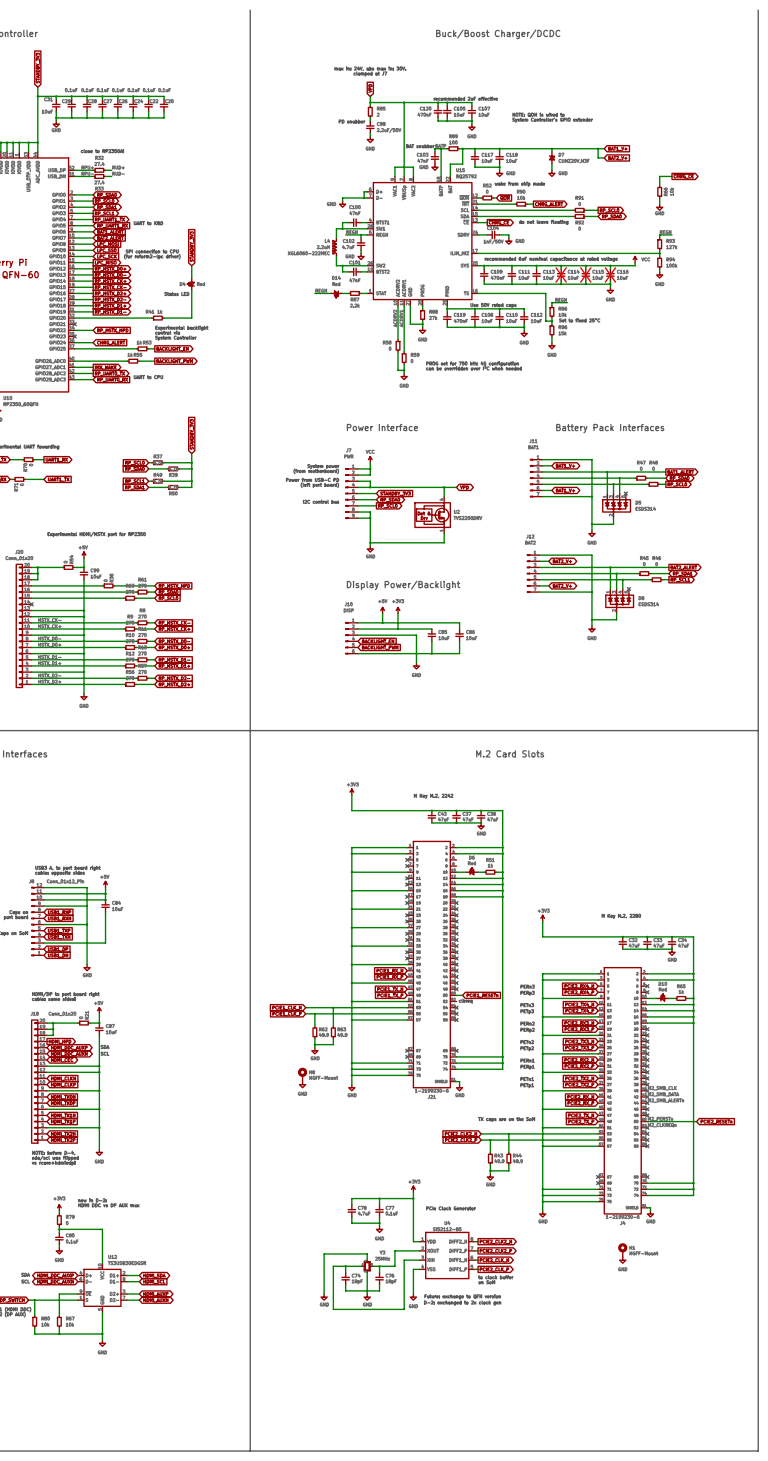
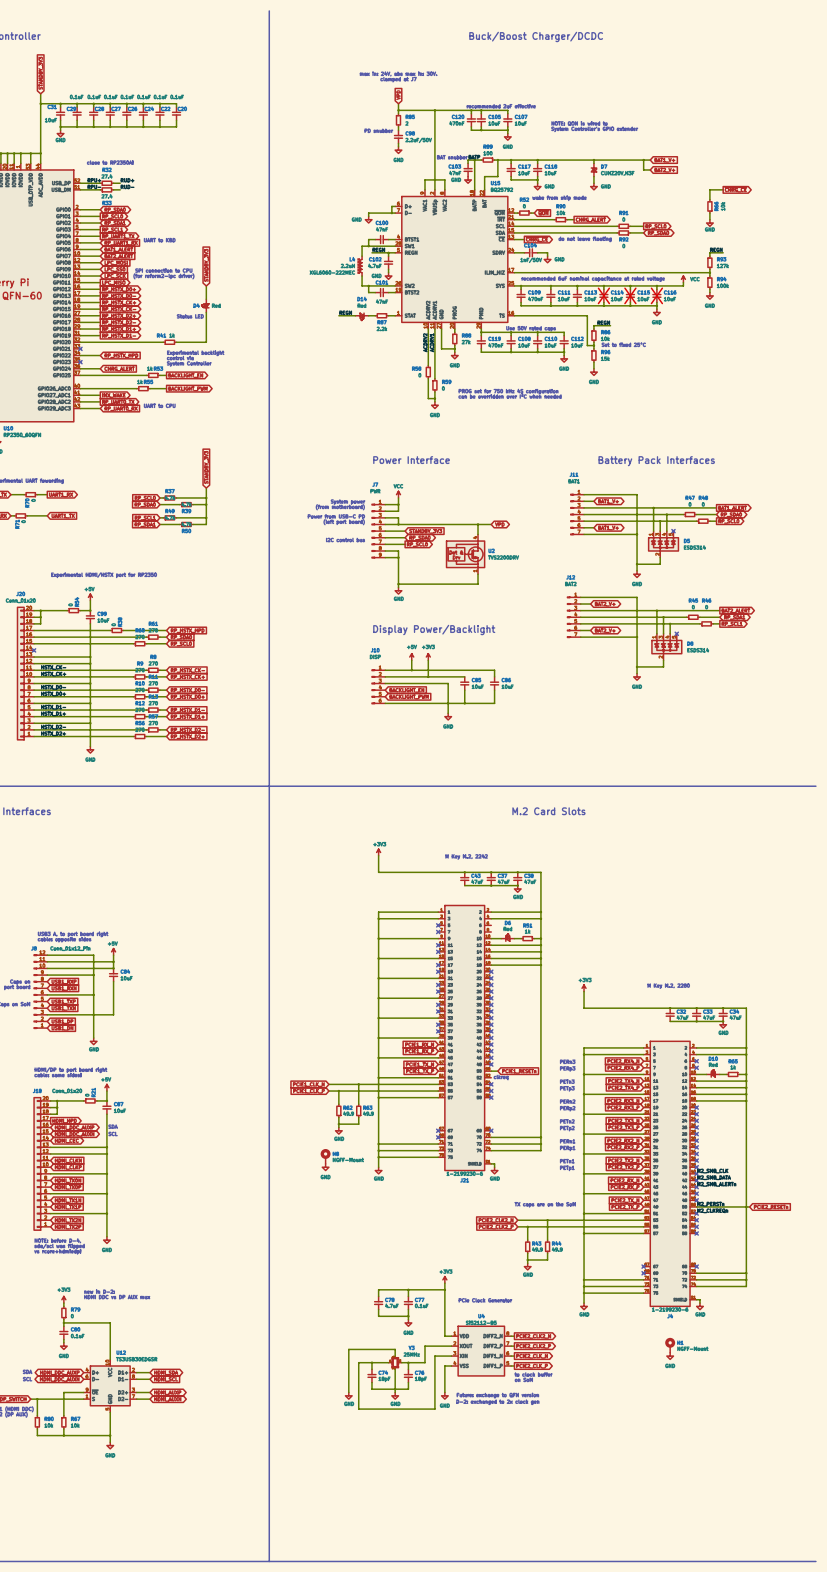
line: (758, 10) (758, 1451) -> none

